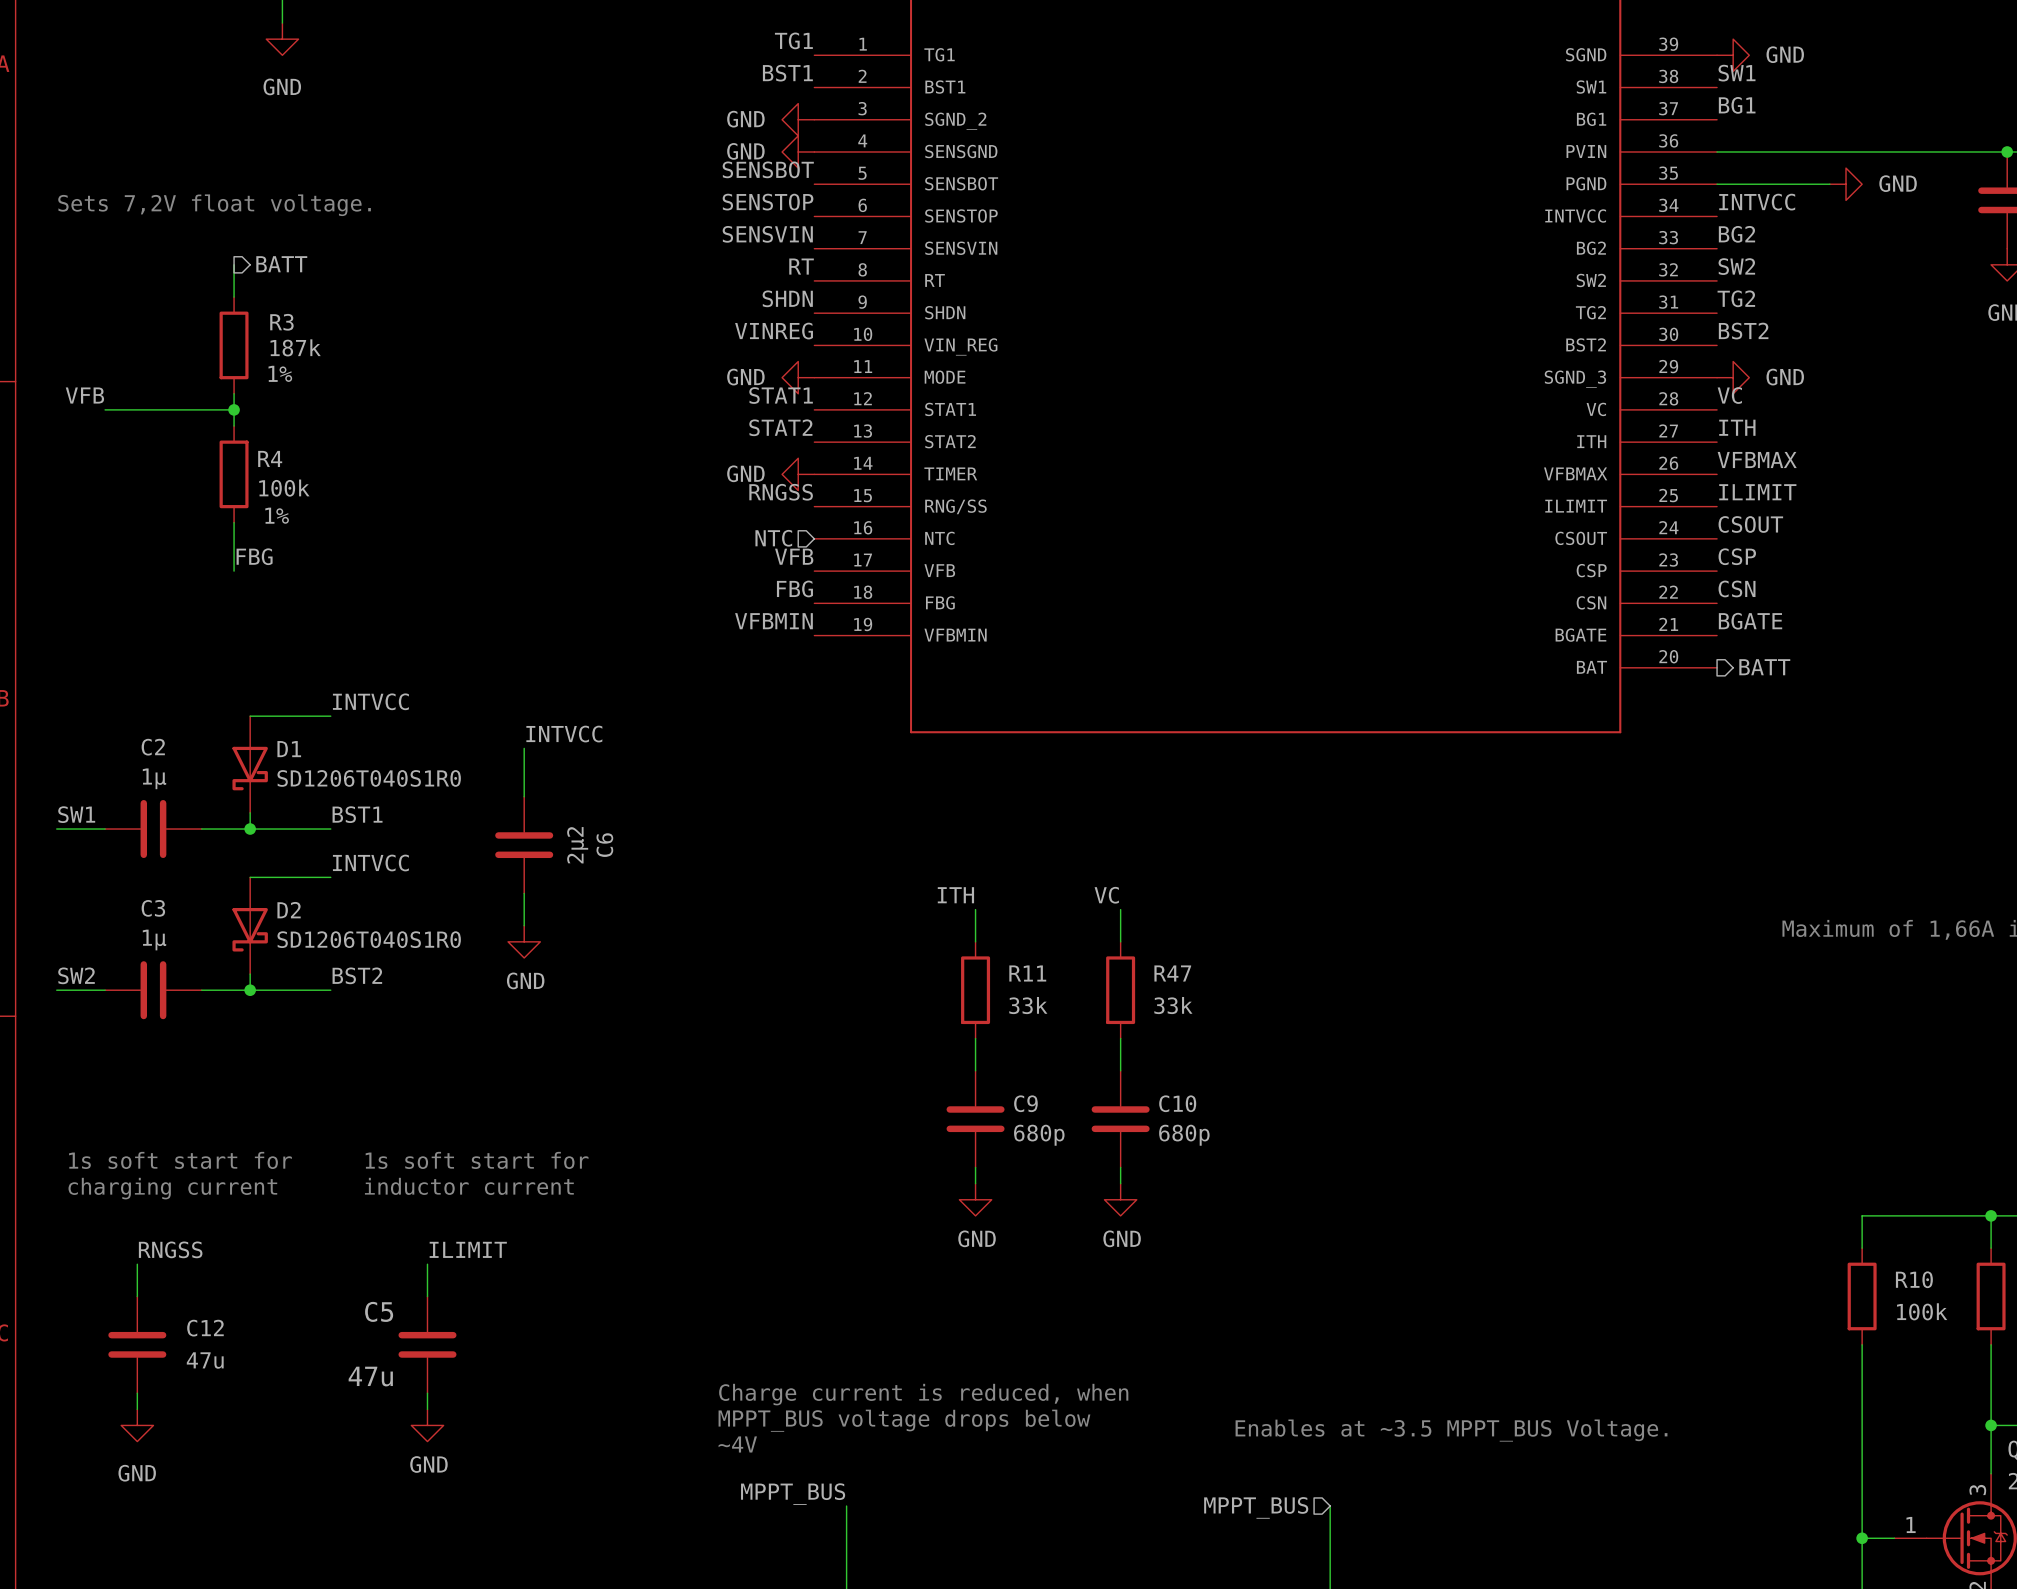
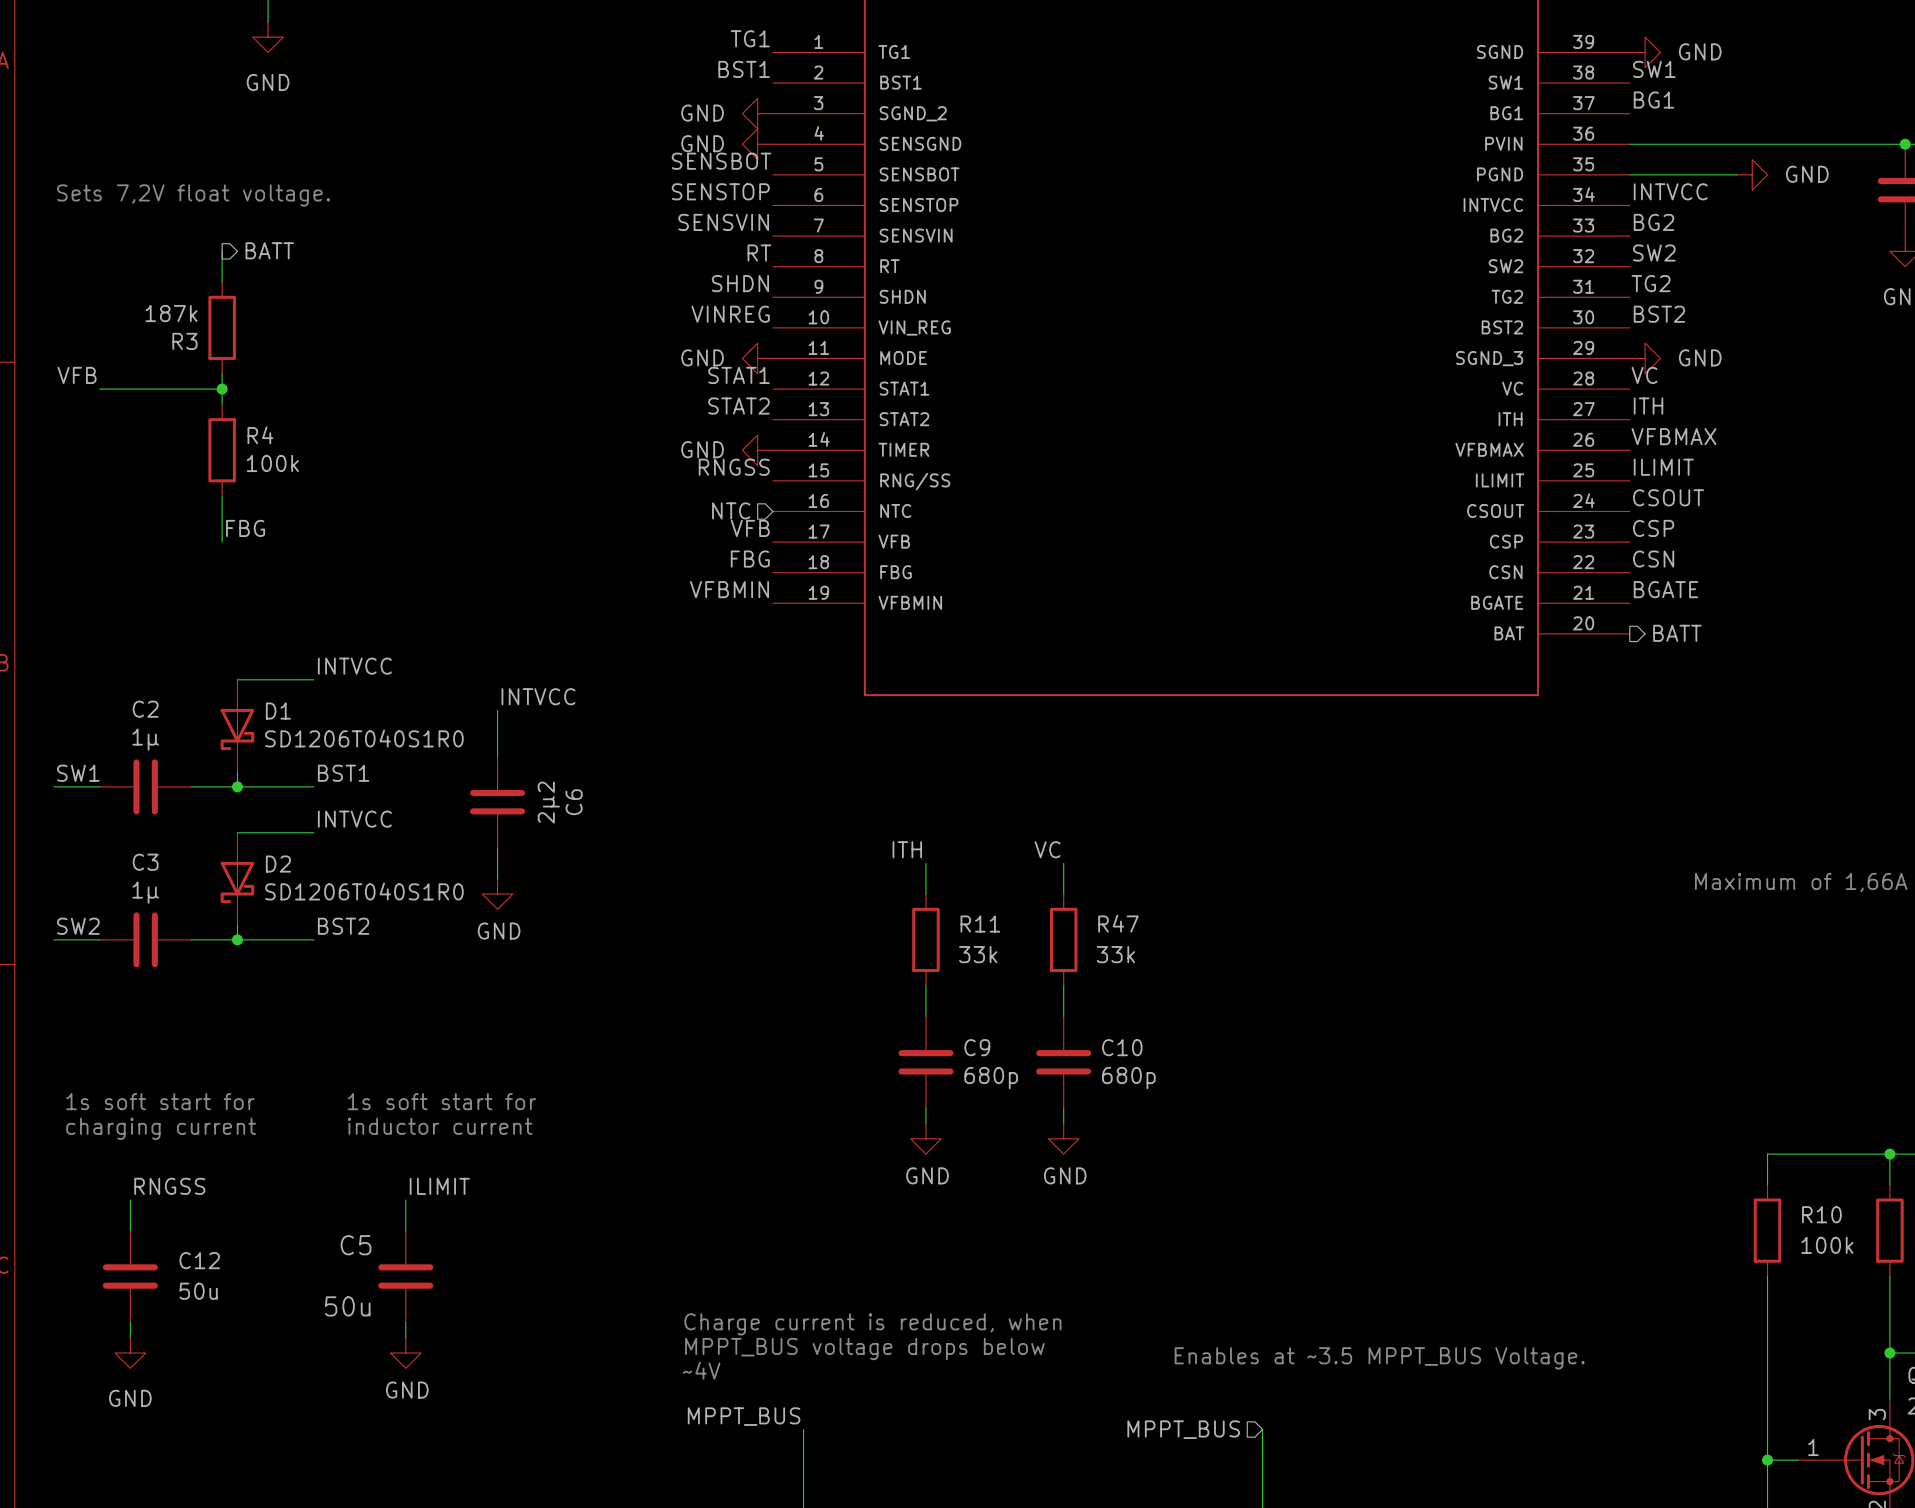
R3 name position: R3 (281, 322) -> R3 (184, 341)
R3 value position: 187k (295, 347) -> 187k (171, 313)
R3 text: 1% (280, 373) -> none
R4 text: 1% (277, 515) -> none
C12 value: 47u (205, 1360) -> 50u (198, 1291)
C5 value: 47u (370, 1376) -> 50u (347, 1306)

